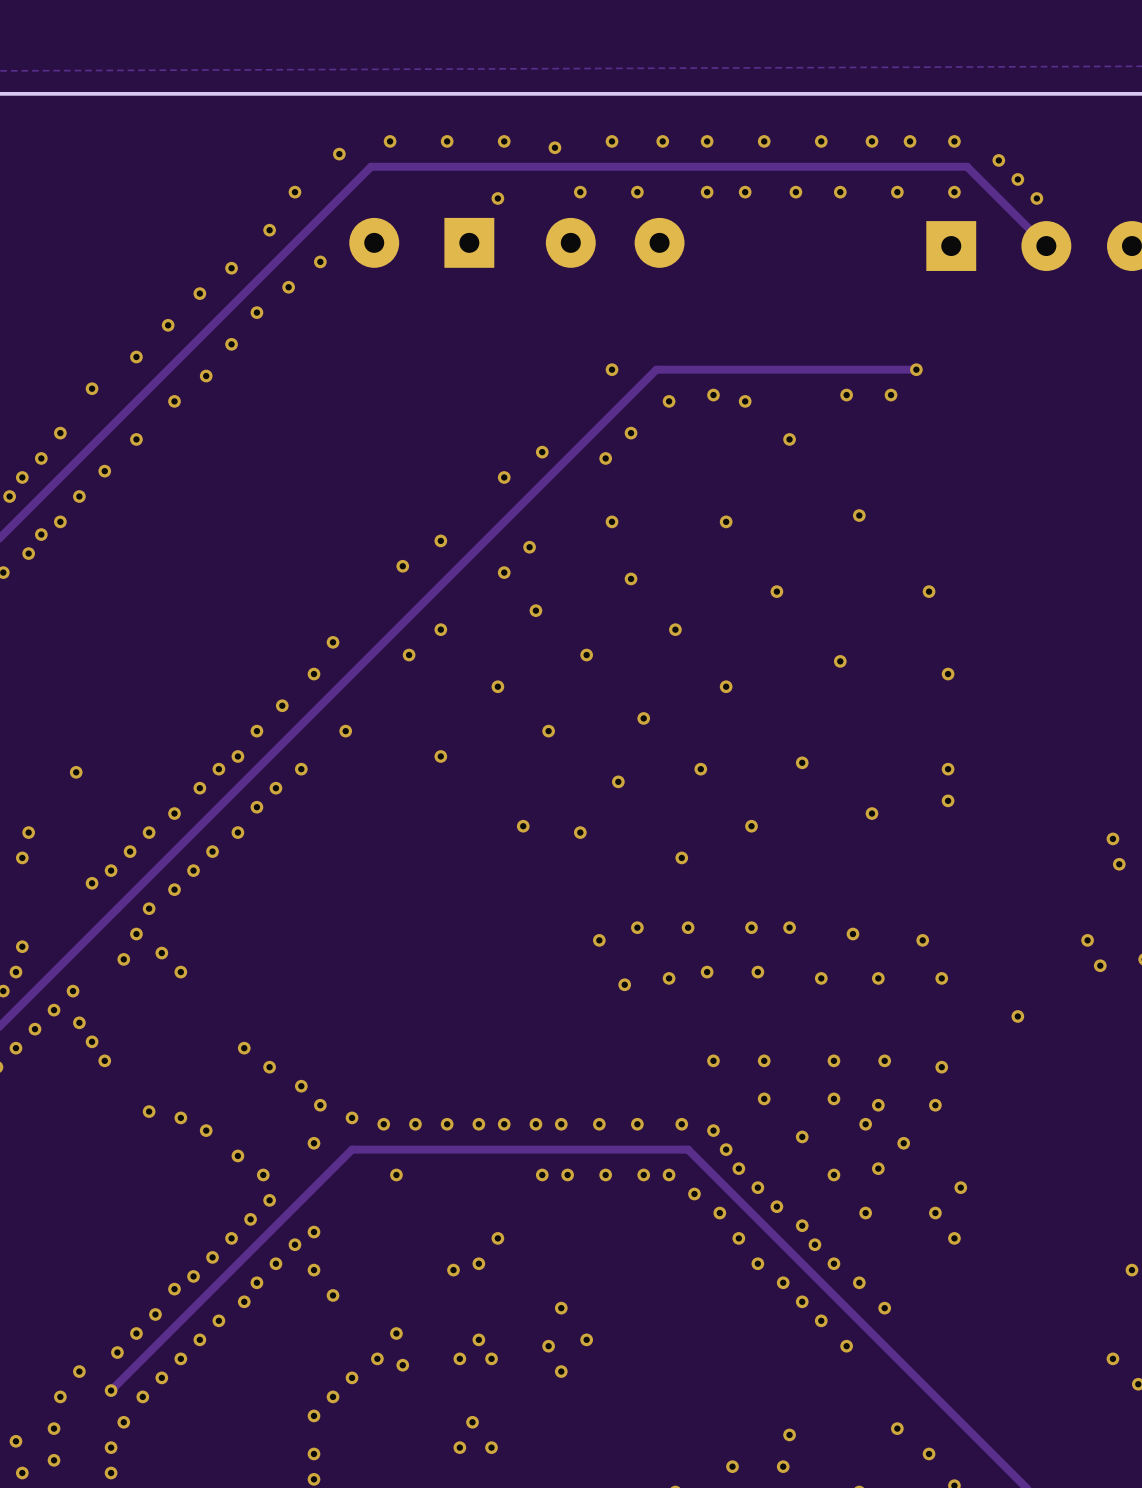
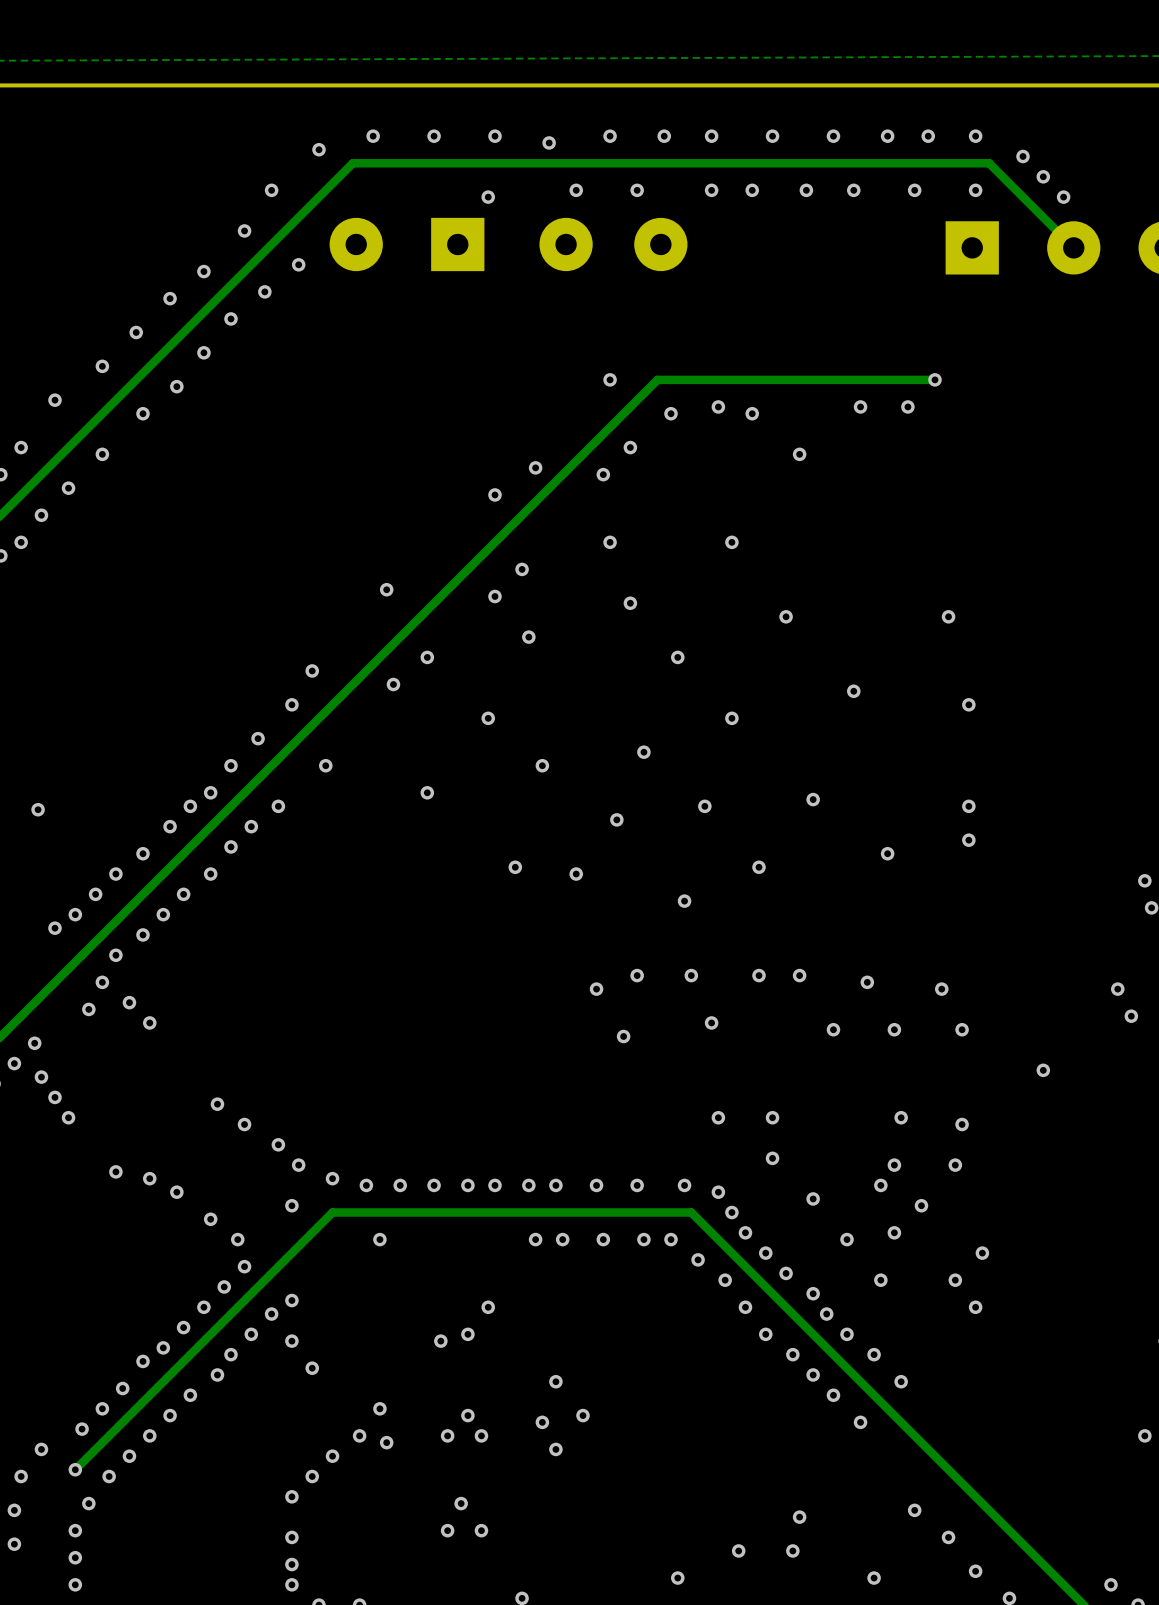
via: (859, 515) -> none
via: (440, 540) -> none
via: (586, 655) -> none
via: (757, 972) -> none
via: (669, 978) -> none
via: (833, 1060) -> none
via: (833, 1098) -> none

